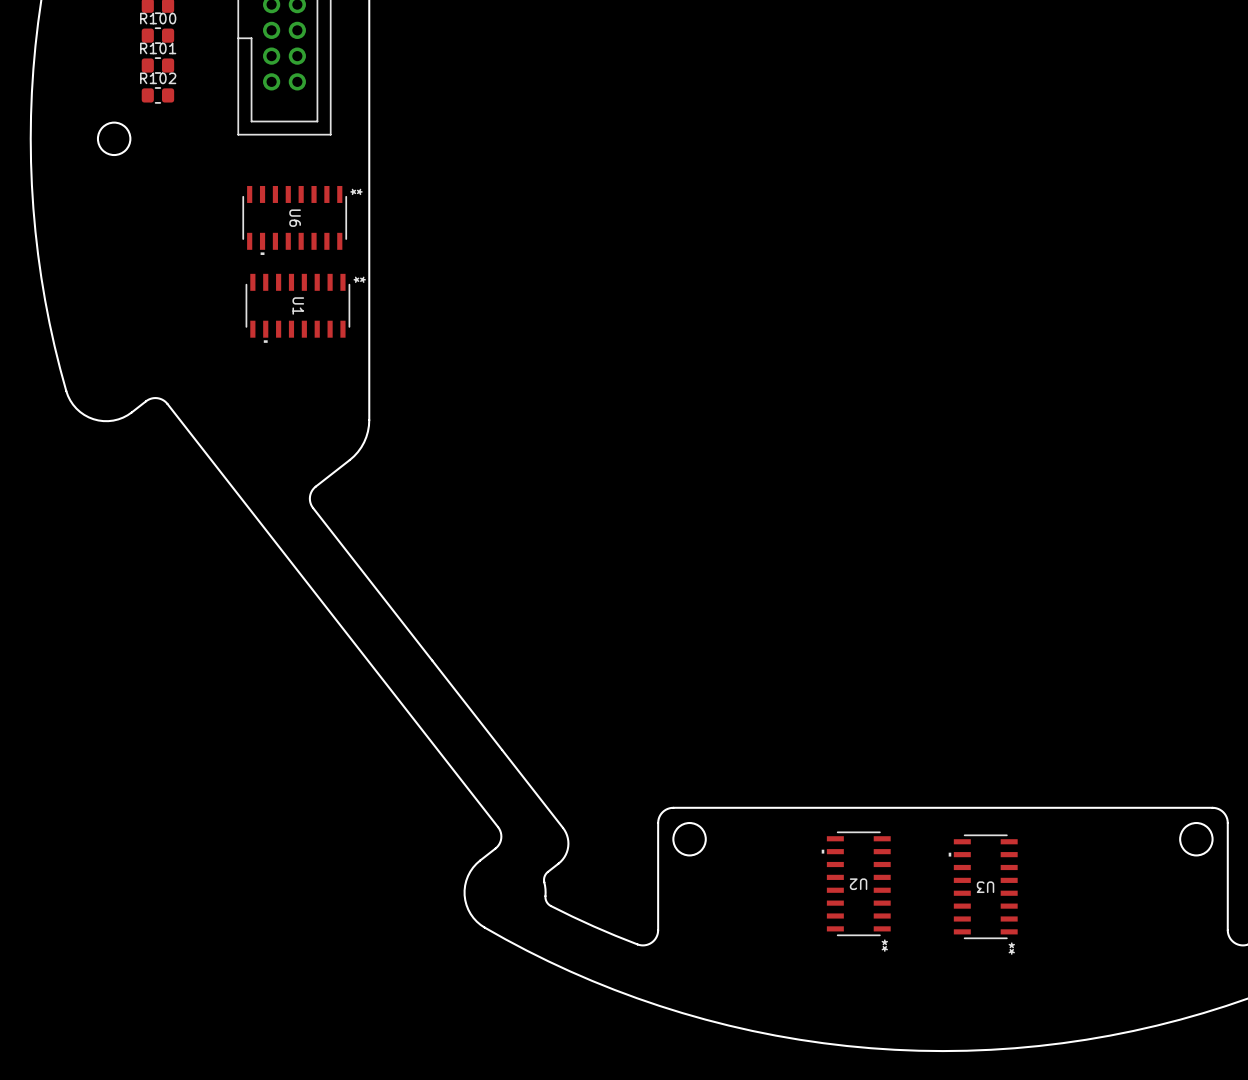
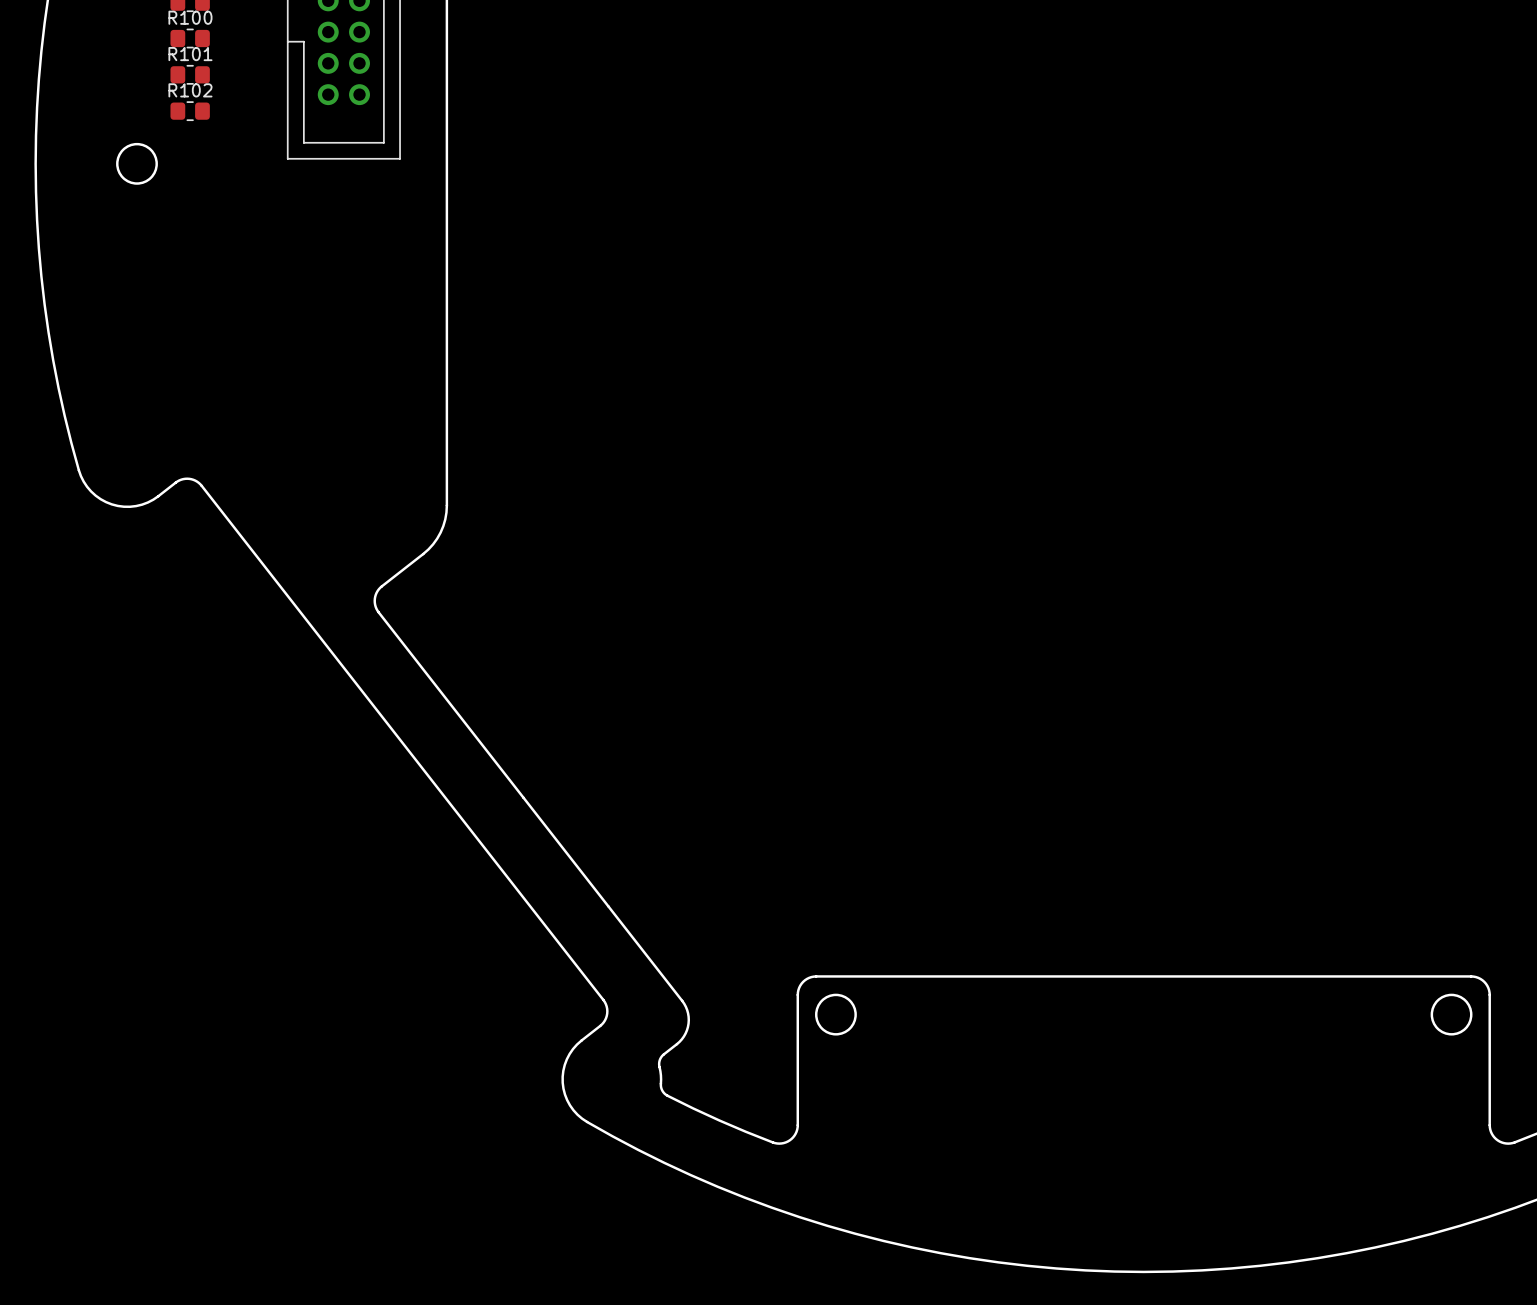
U6: (294, 220) -> none
U1: (297, 308) -> none
U2: (856, 883) -> none
U3: (983, 886) -> none

